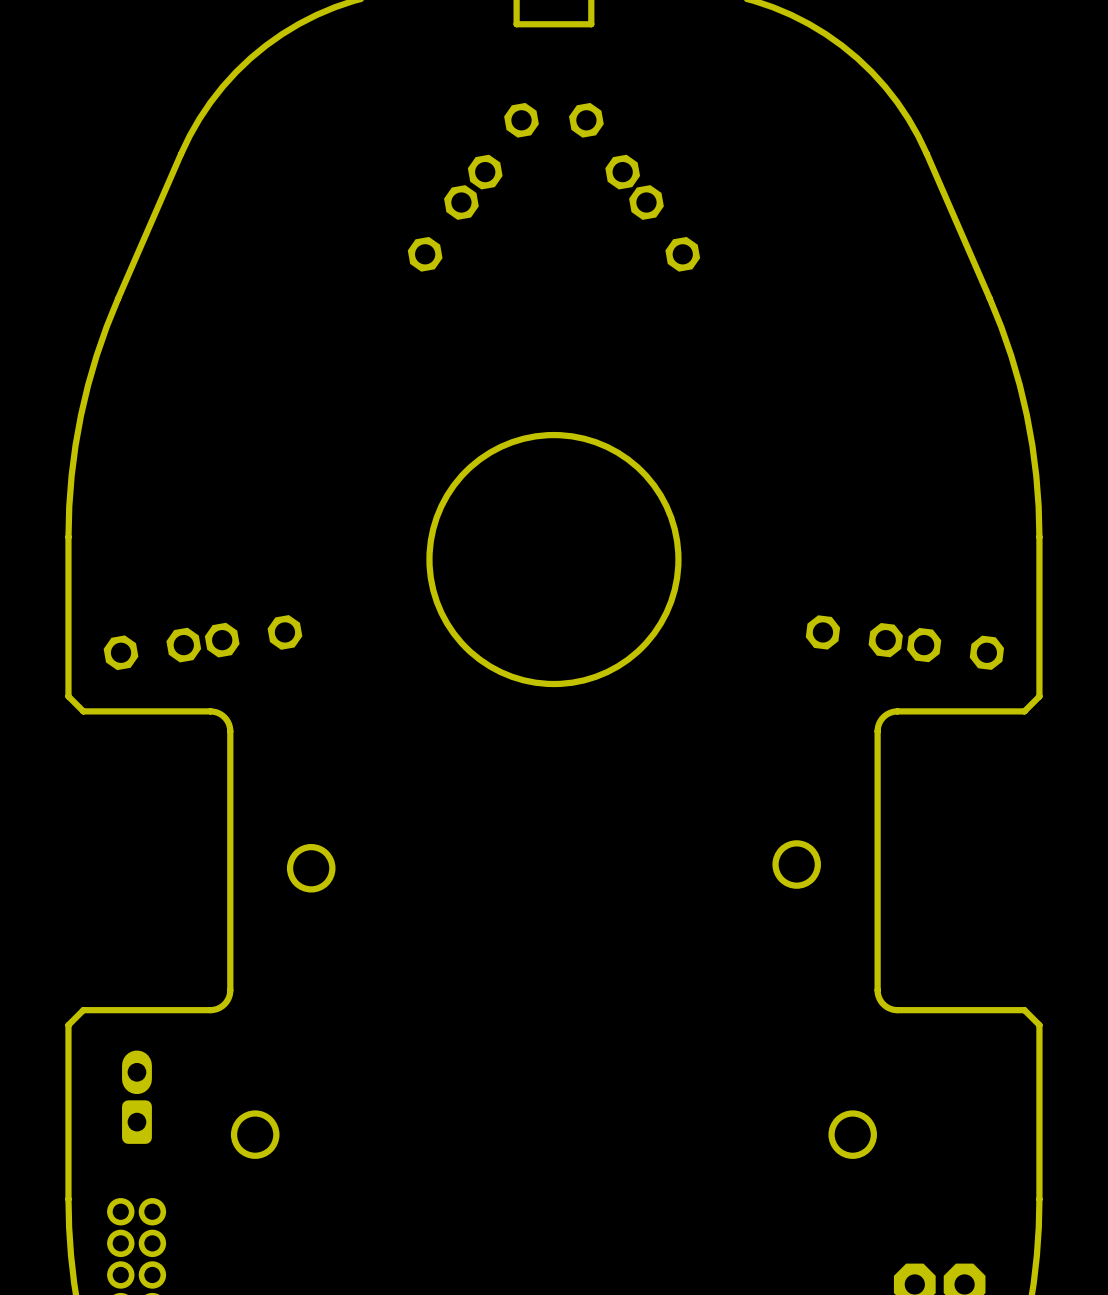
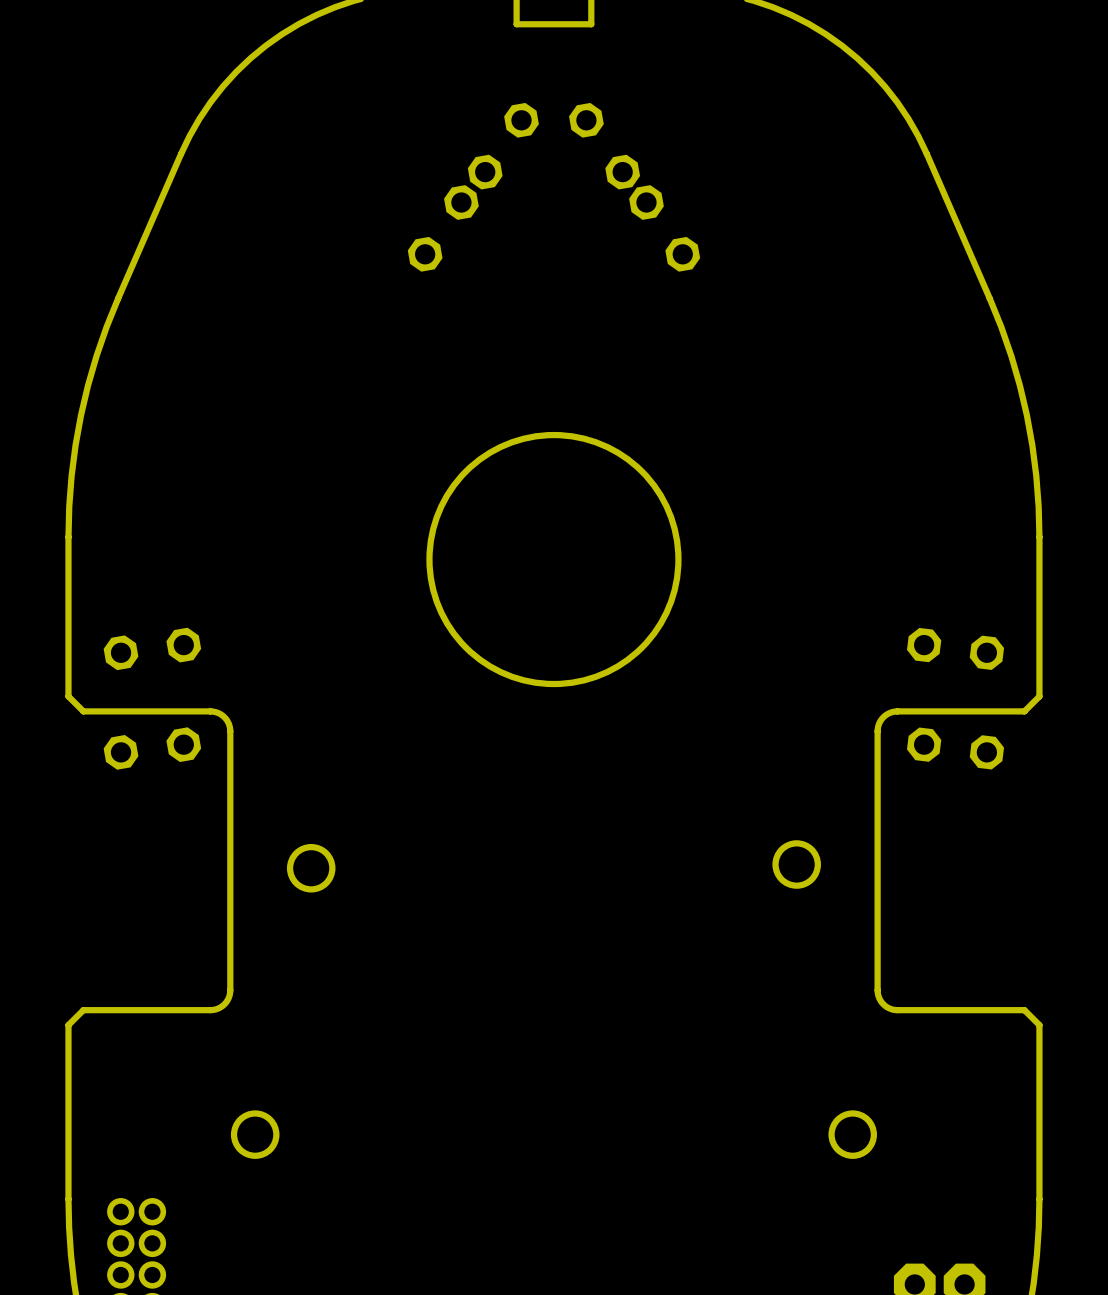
part position: (253, 636) -> (152, 748)
part position: (854, 636) -> (955, 748)
part: (136, 1097) -> none

